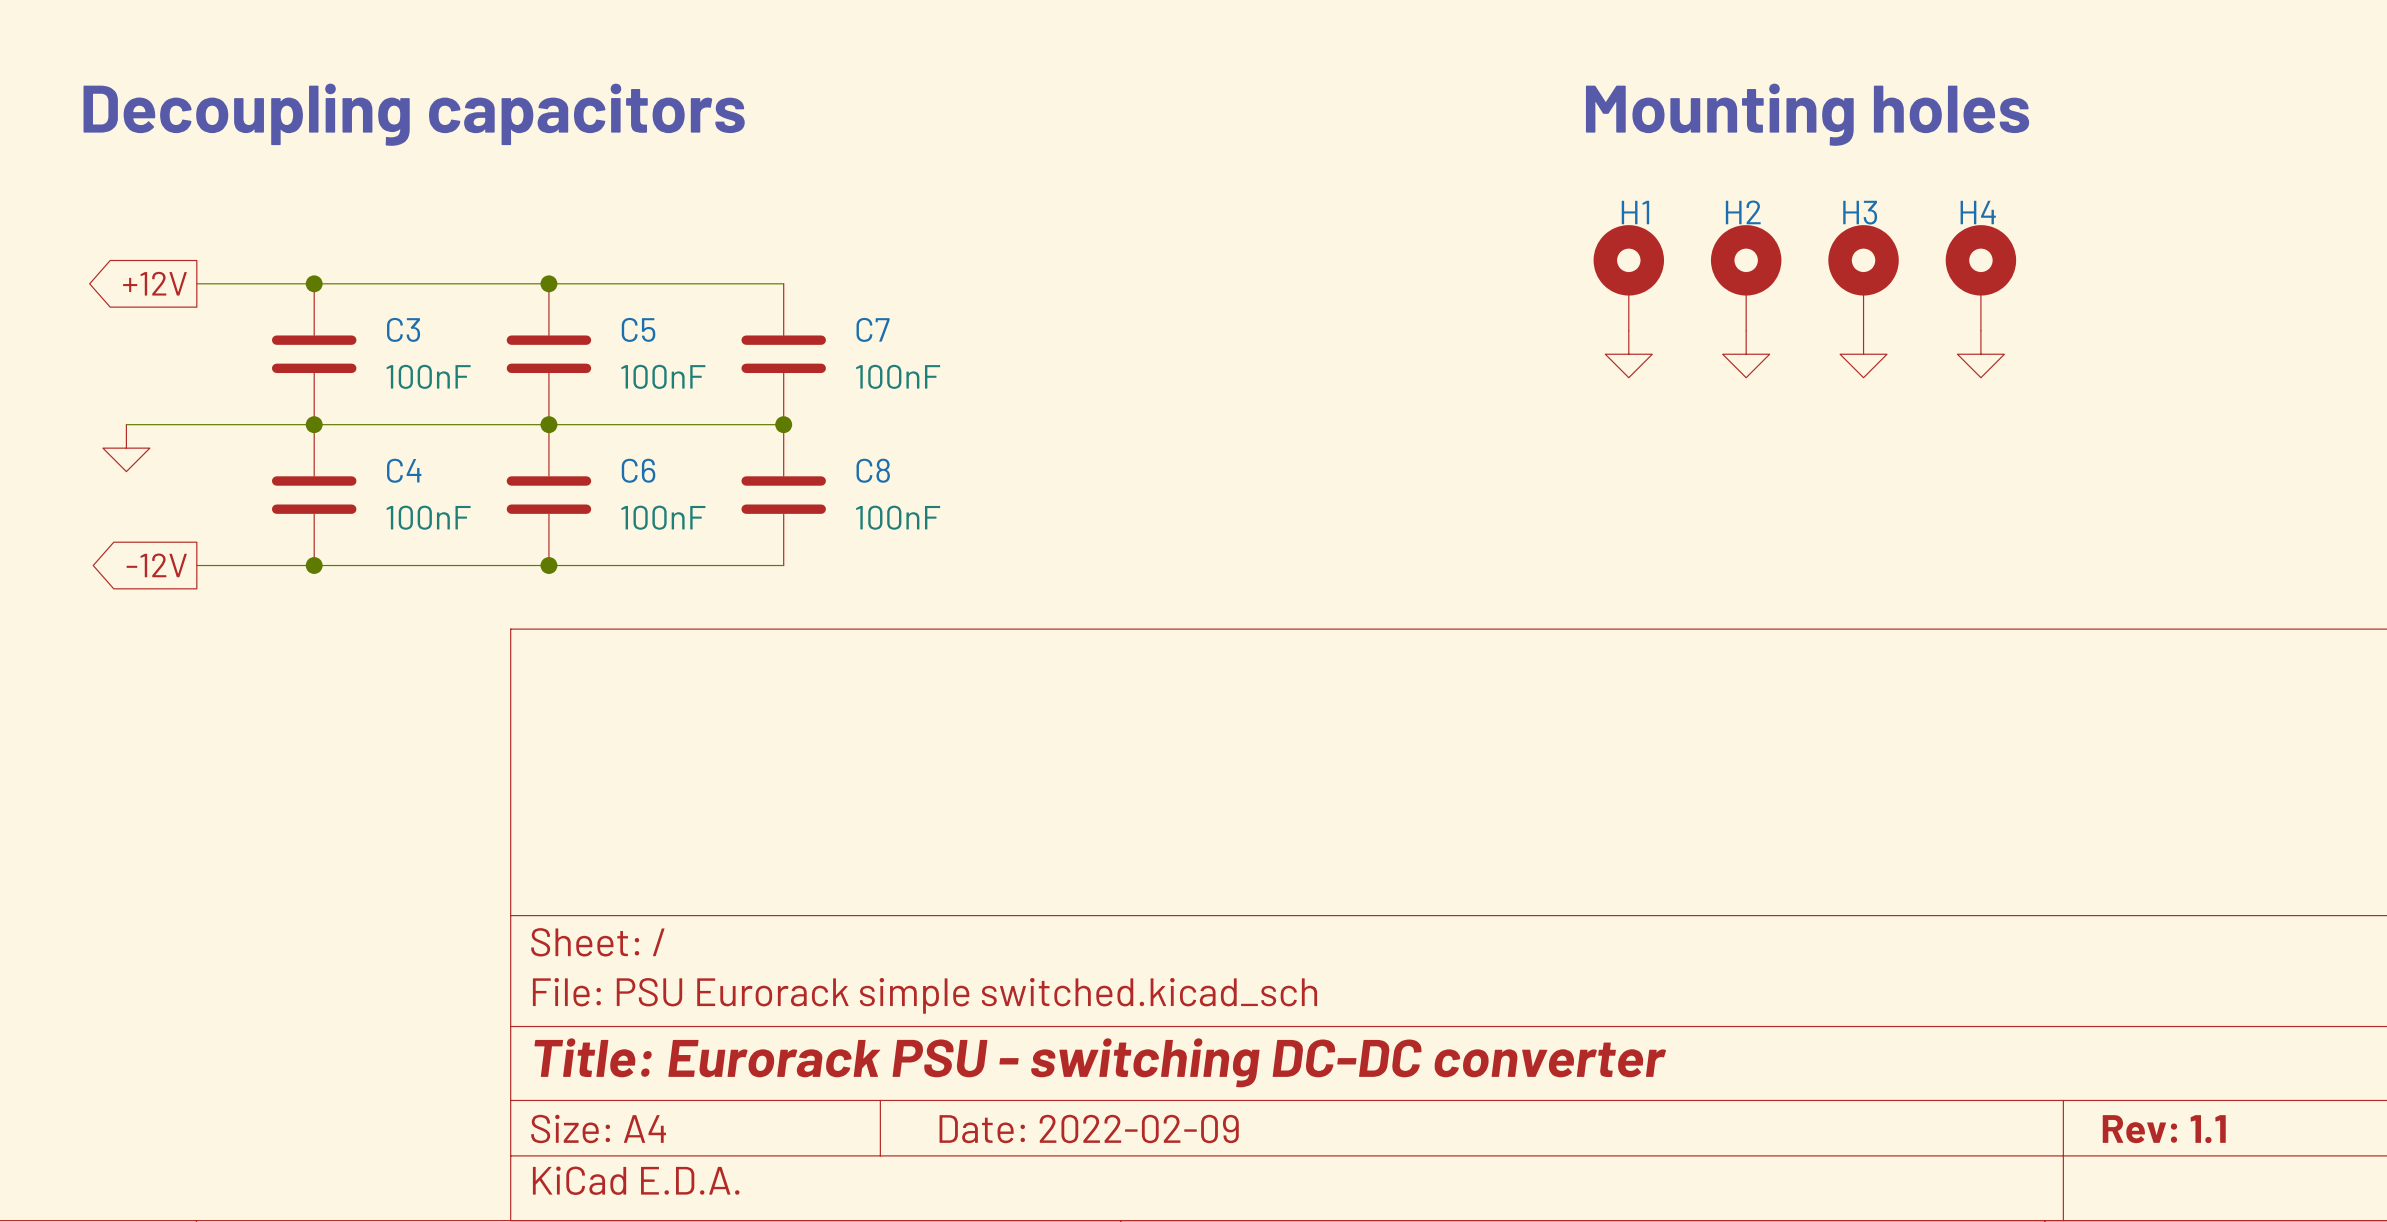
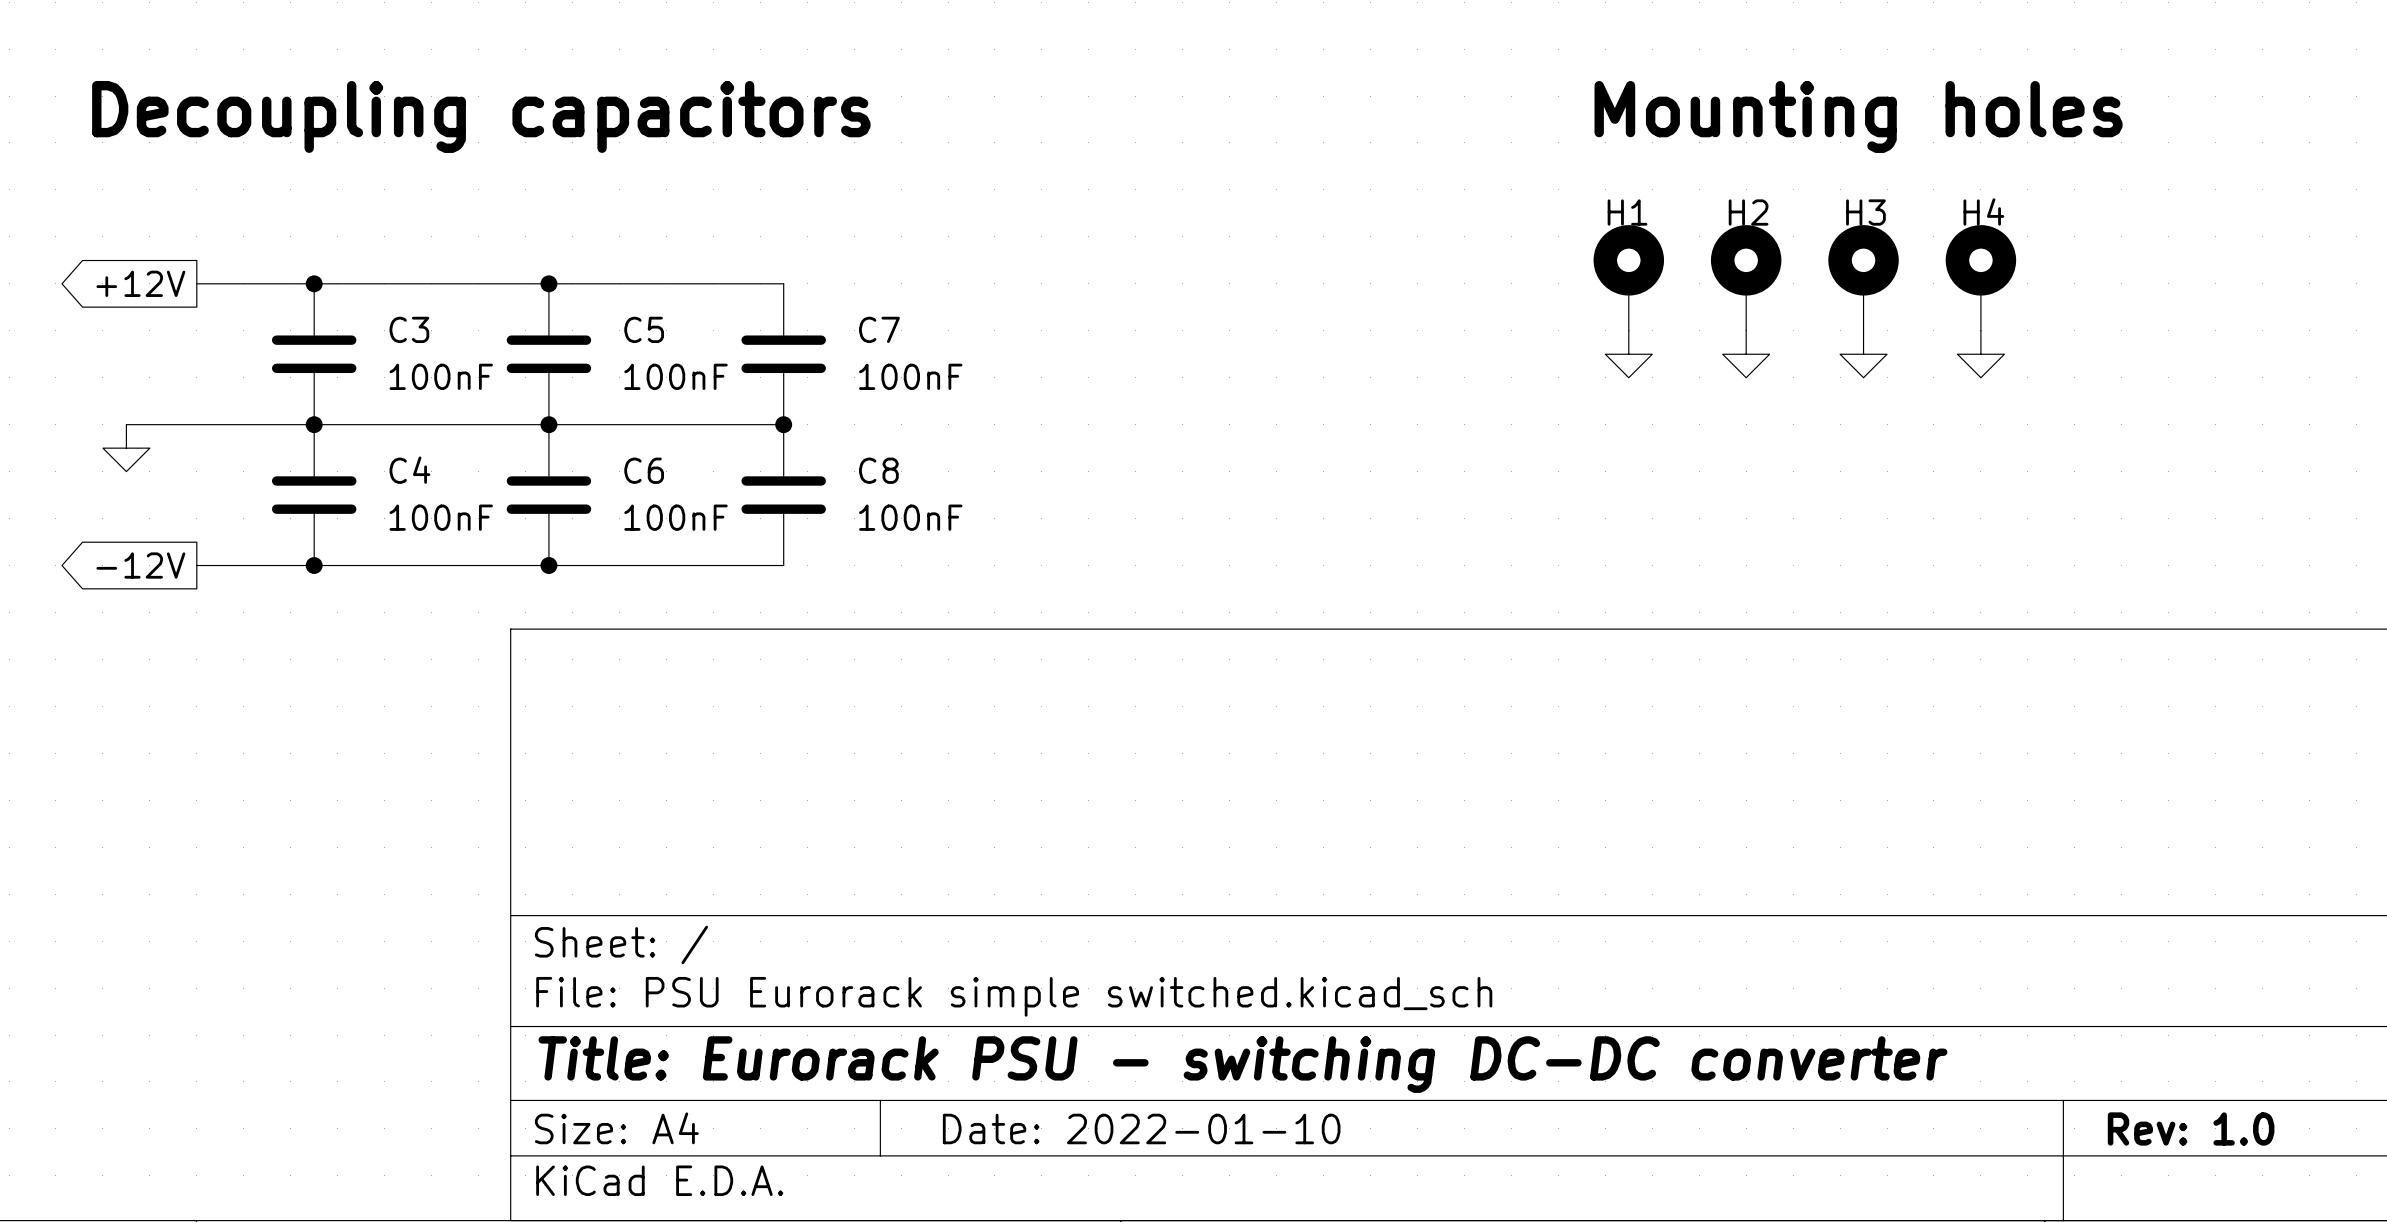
title block: Date: 2022-02-09 (1089, 1129) -> Date: 2022-01-10 (1141, 1128)
title block: Rev: 1.1 (2164, 1129) -> Rev: 1.0 (2191, 1128)

